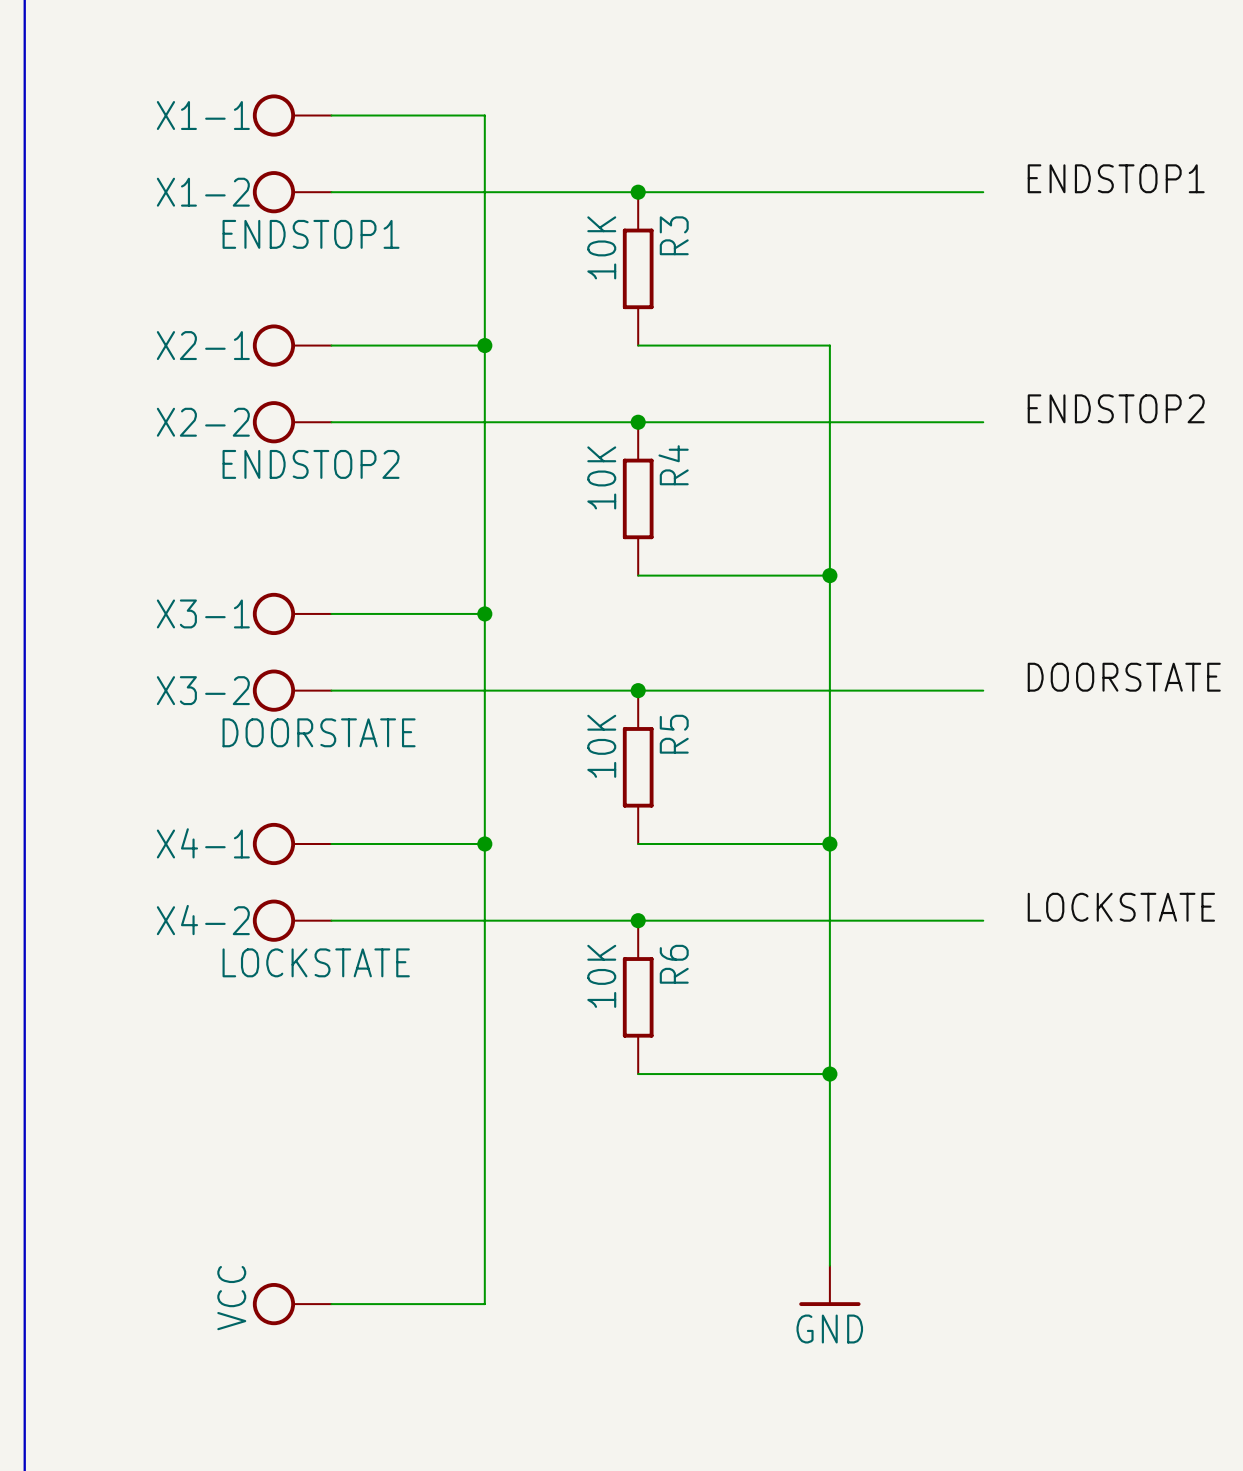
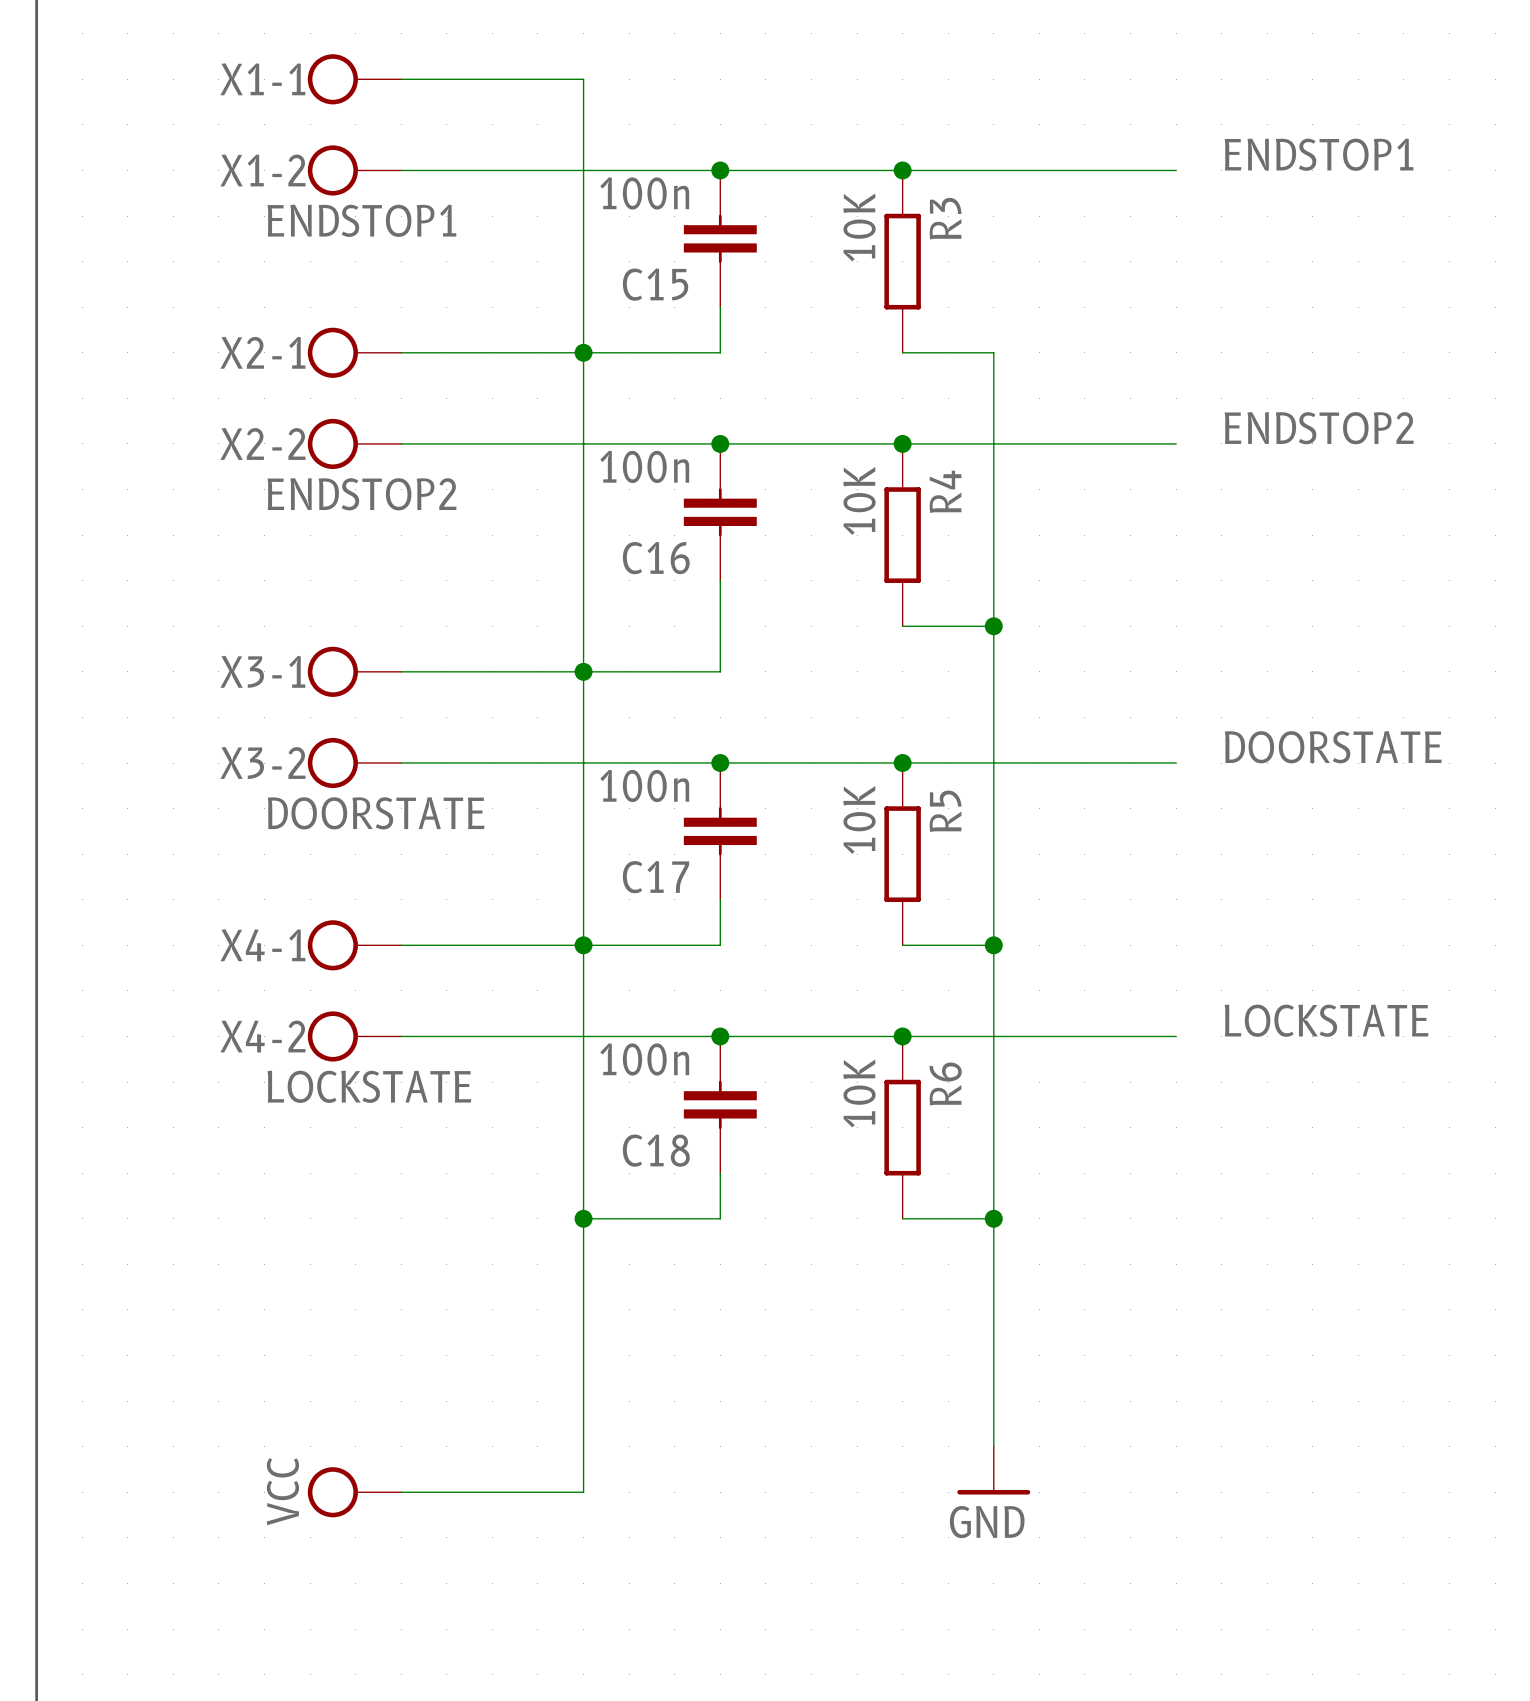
junction position: (638, 192) -> (720, 170)
junction: none -> (902, 170)
C15: none -> 100n (720, 238)
R3 position: (638, 268) -> (902, 261)
wire: none -> (720, 307) (720, 352) (583, 352)
wire: (638, 345) (753, 345) -> none
junction position: (638, 422) -> (720, 443)
junction: none -> (902, 443)
C16: none -> 100n (720, 512)
R4 position: (638, 498) -> (902, 535)
wire: none -> (720, 580) (720, 671) (583, 671)
wire: (638, 575) (753, 575) -> none
junction position: (638, 690) -> (720, 763)
junction: none -> (902, 763)
C17: none -> 100n (720, 831)
R5 position: (638, 767) -> (902, 854)
wire: none -> (720, 899) (720, 945) (583, 945)
wire: (638, 844) (753, 844) -> none
junction position: (638, 920) -> (720, 1036)
junction: none -> (902, 1036)
C18: none -> 100n (720, 1104)
R6 position: (638, 997) -> (902, 1127)
wire: none -> (720, 1173) (720, 1218) (583, 1218)
junction: none -> (583, 1218)
wire: (638, 1074) (753, 1074) -> none

